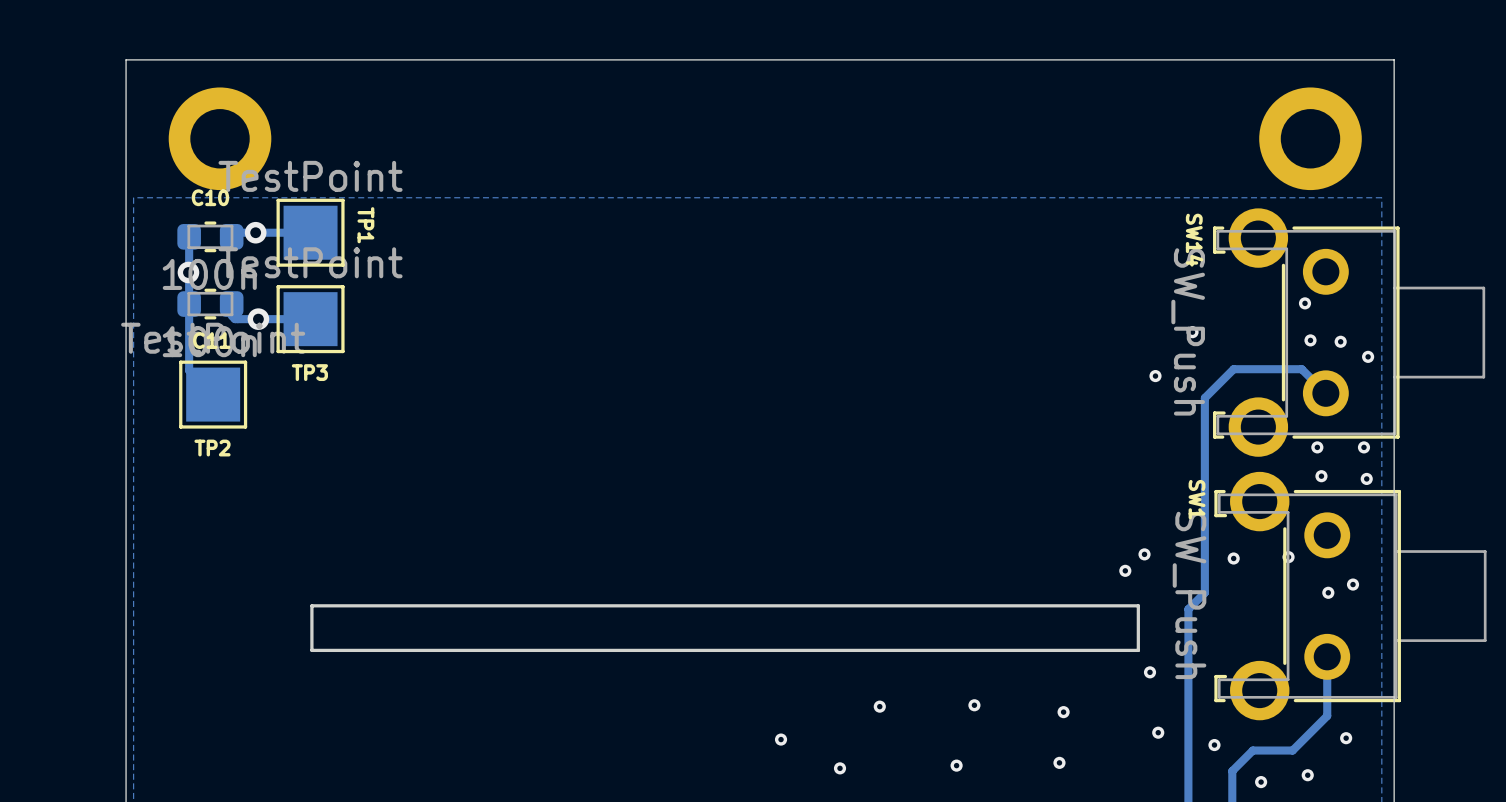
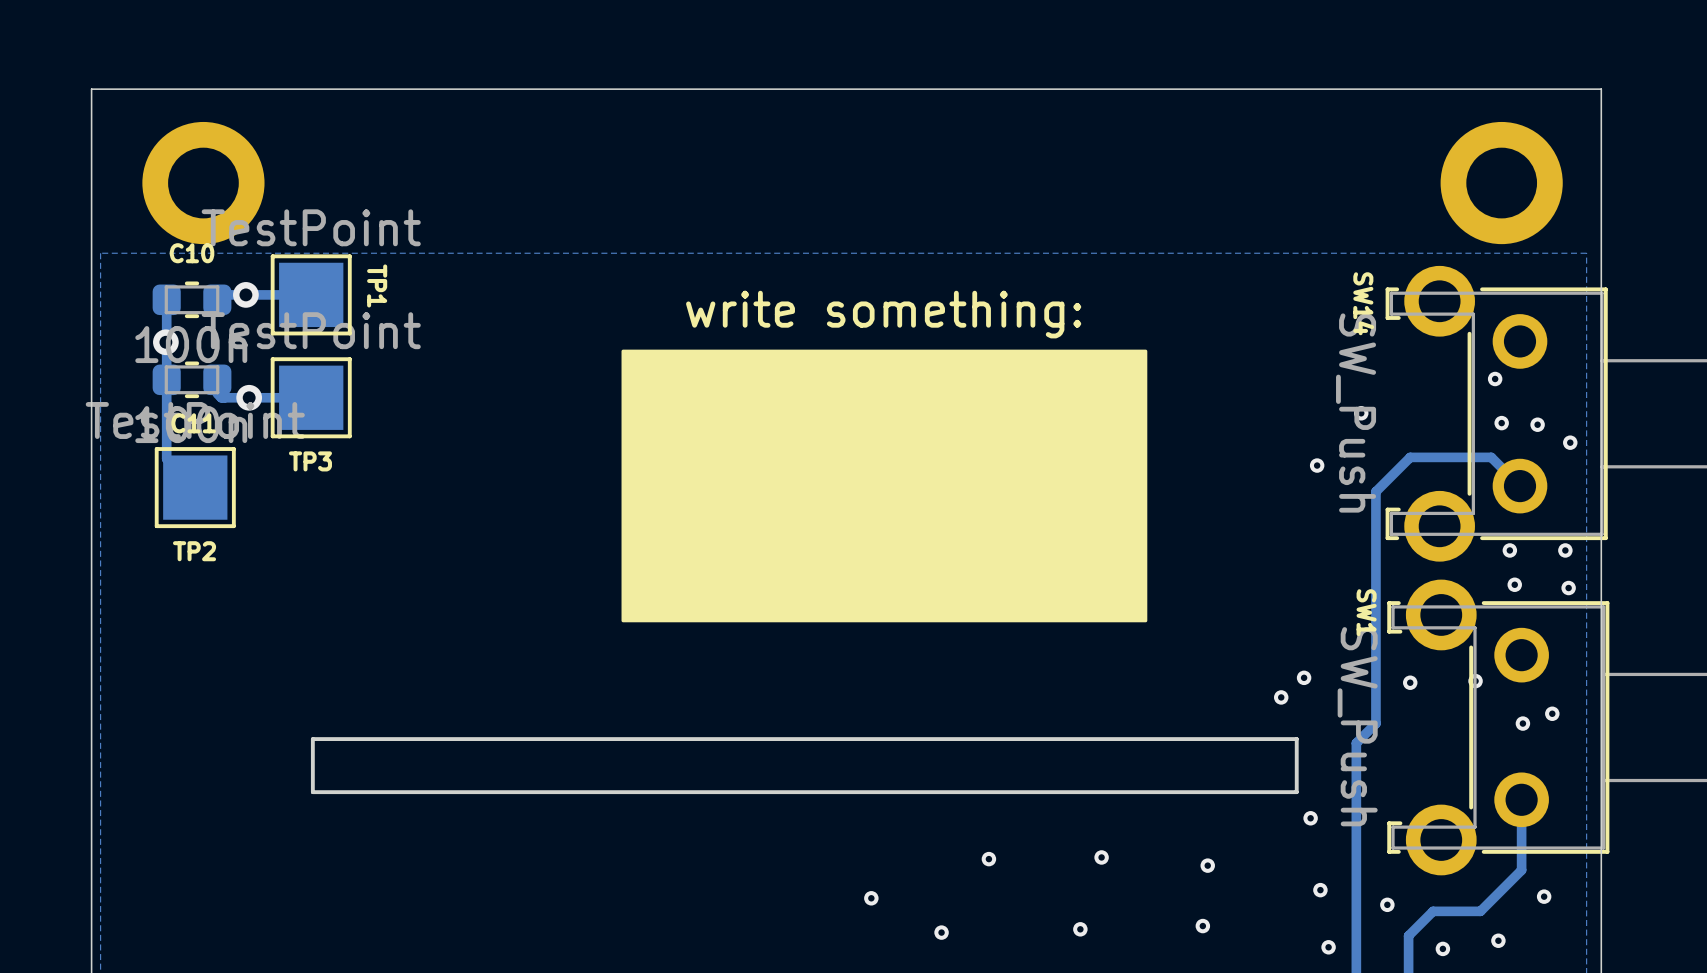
text: none -> write something: (883, 314)
drawing: none -> [621, 349, 1148, 623]
via: none -> (1328, 947)

